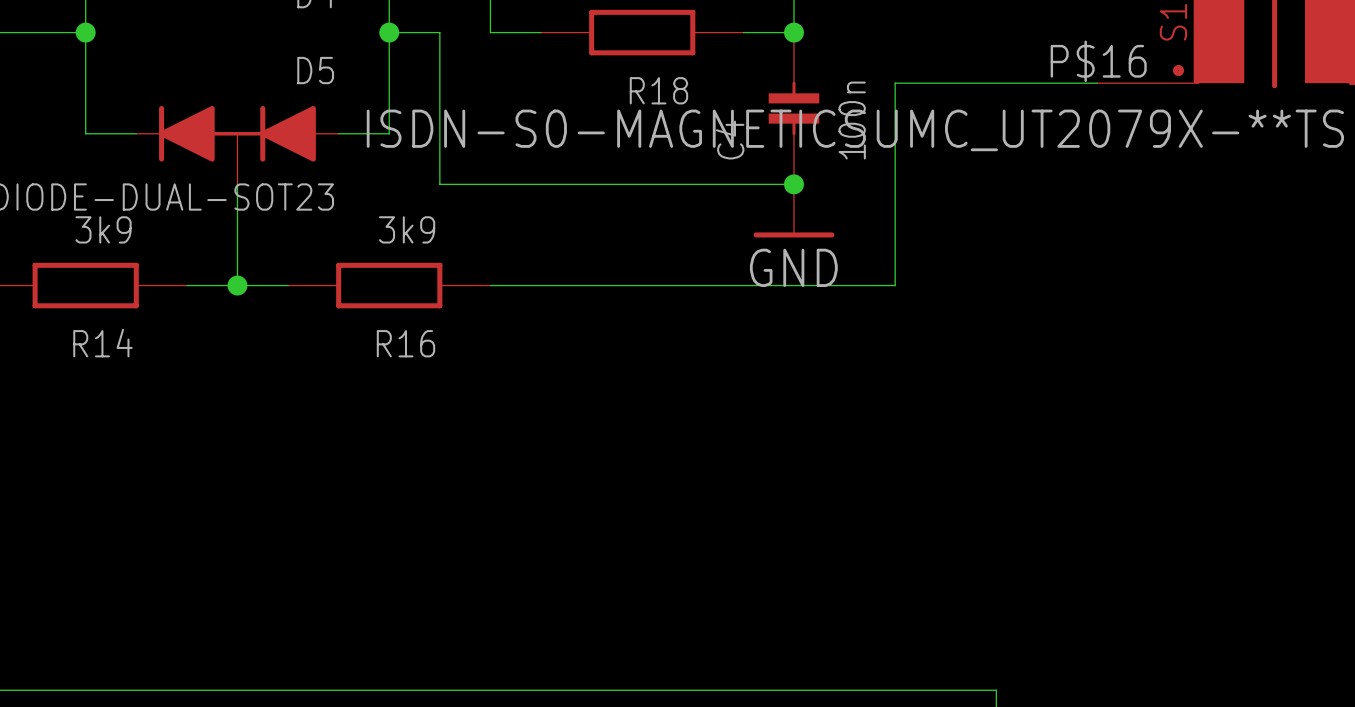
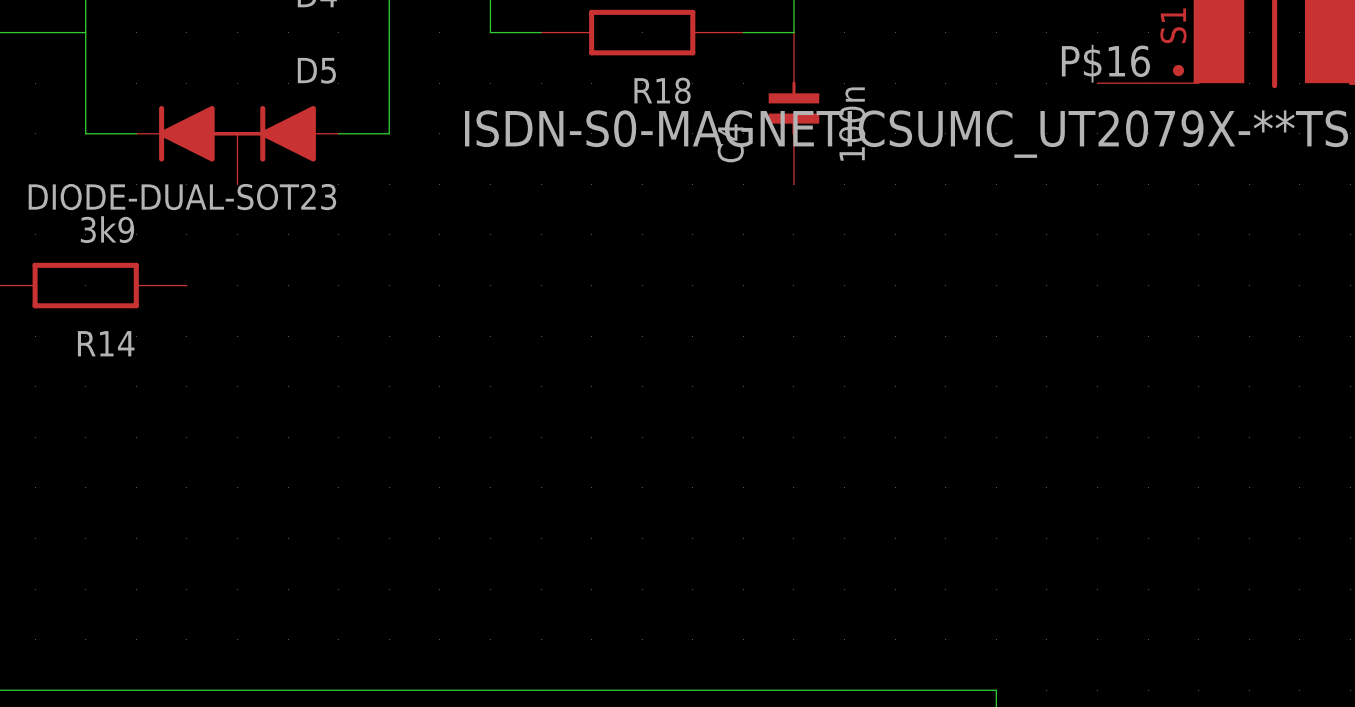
junction: (85, 32) -> none
wire: (389, 32) (439, 32) (439, 184) (793, 184) -> none
junction: (389, 32) -> none
junction: (793, 32) -> none
wire: (1097, 83) (895, 83) (895, 285) (490, 285) -> none
wire: (237, 184) (237, 285) -> none
junction: (793, 184) -> none
power symbol: GND (793, 210) -> none
wire: (186, 285) (288, 285) -> none
junction: (237, 285) -> none
R16: 3k9 (389, 285) -> none

